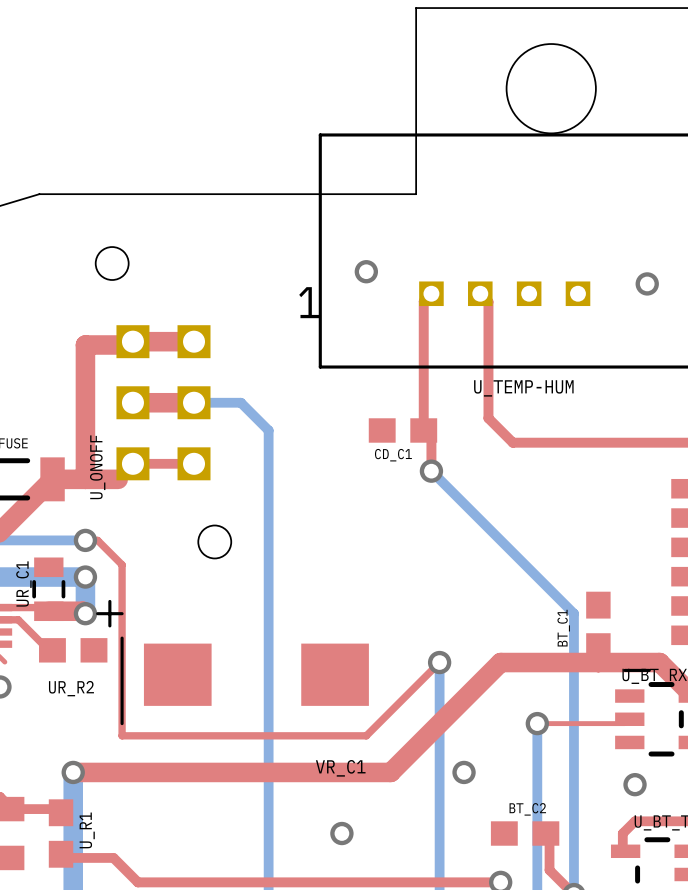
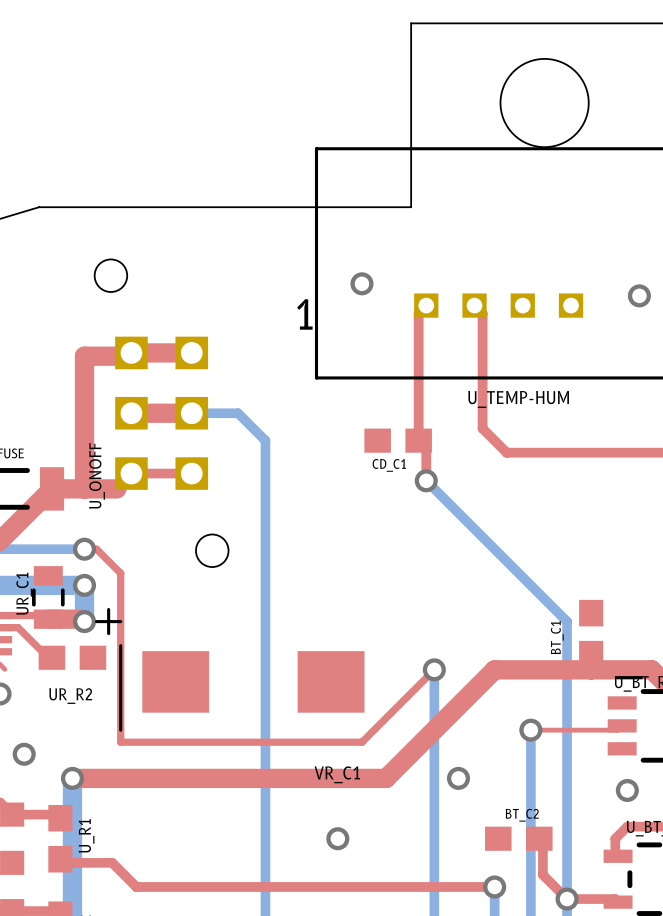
via: none -> (24, 754)

